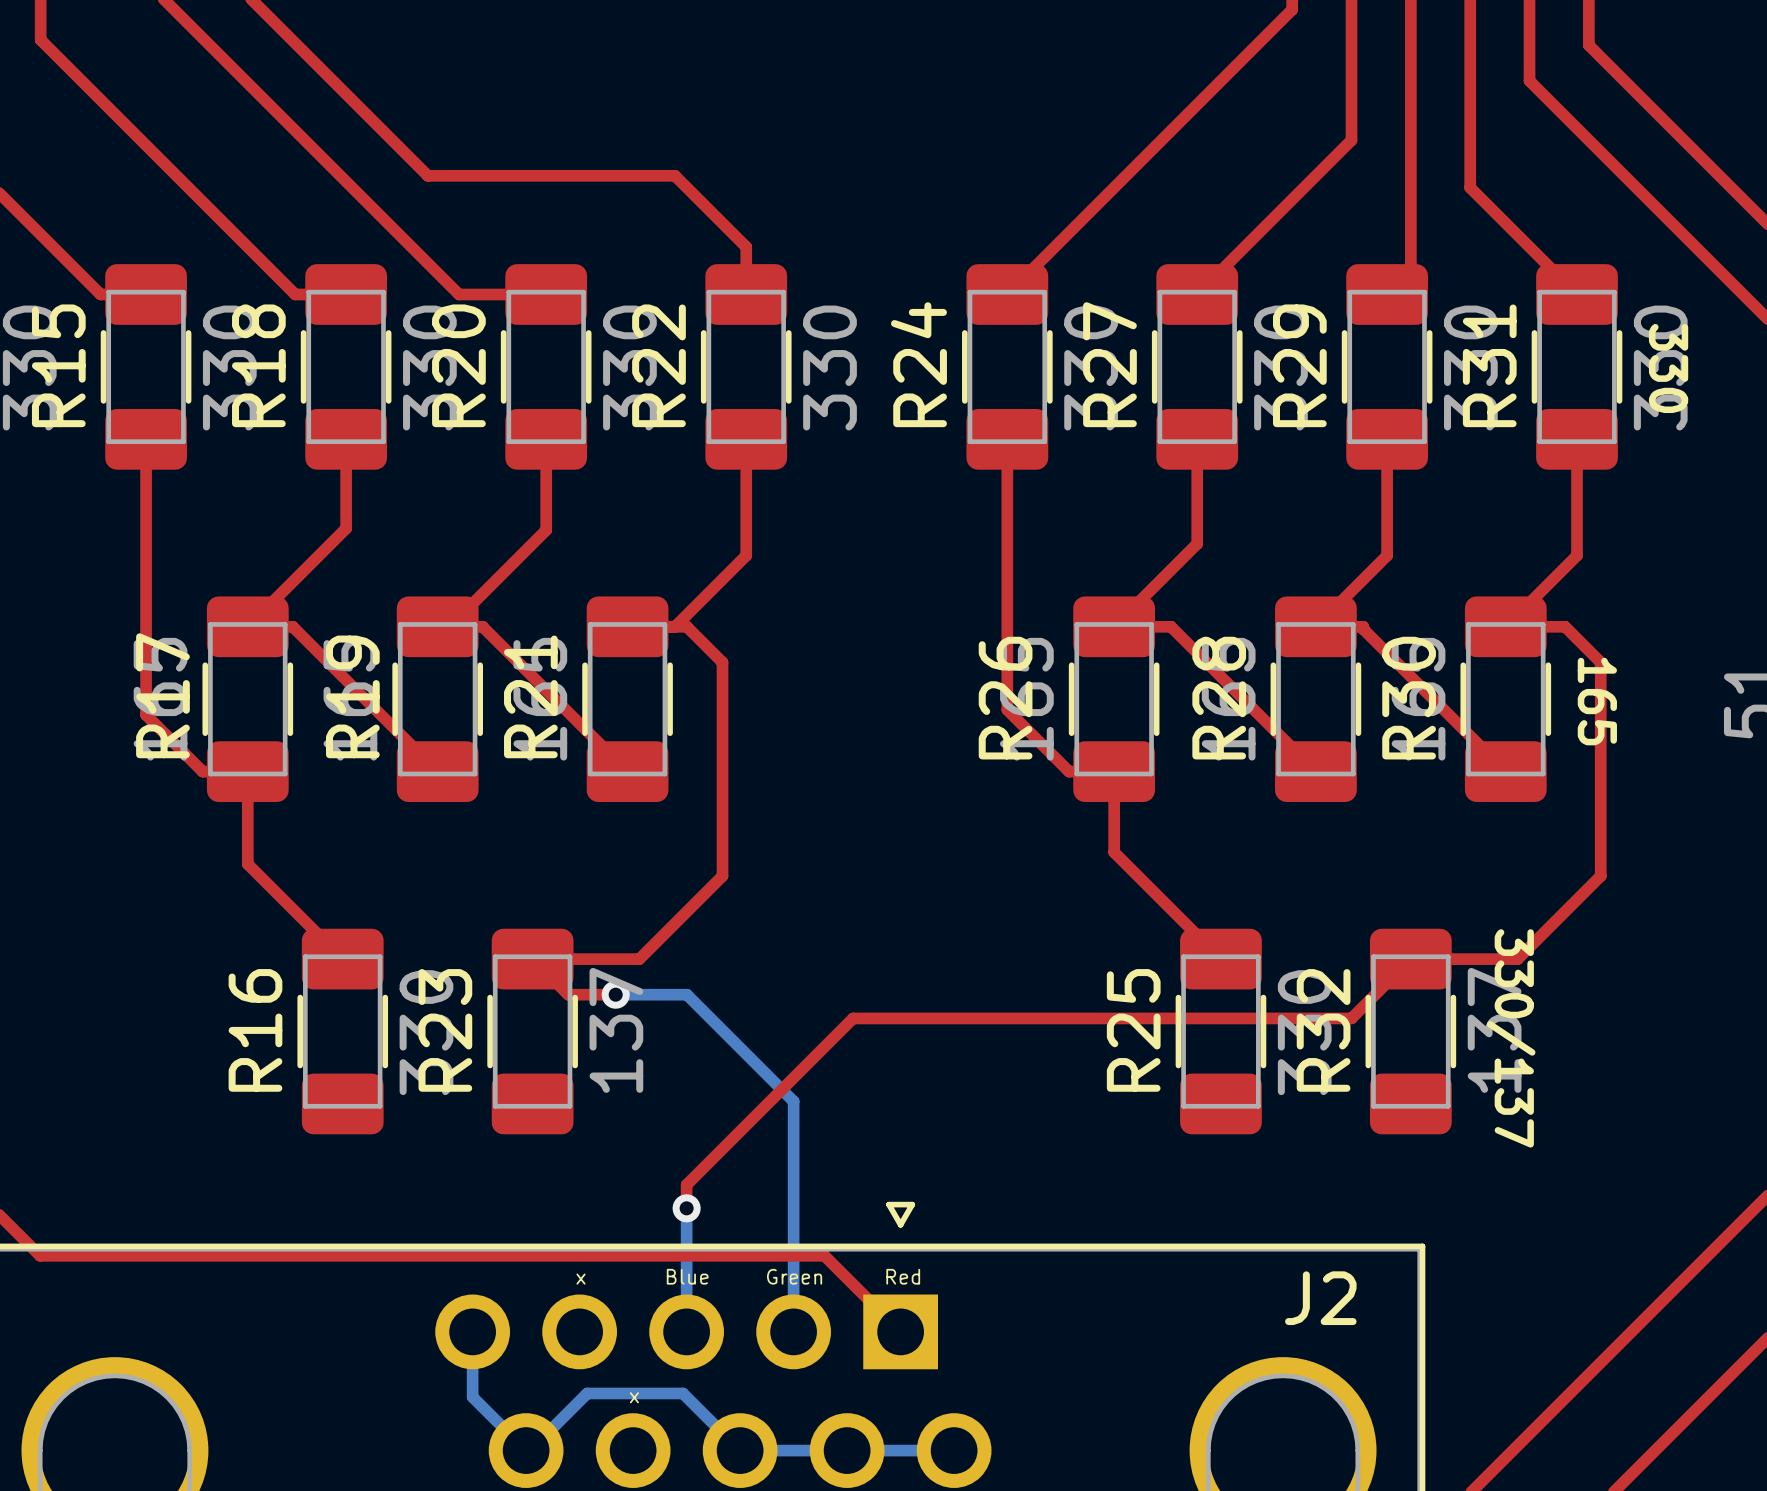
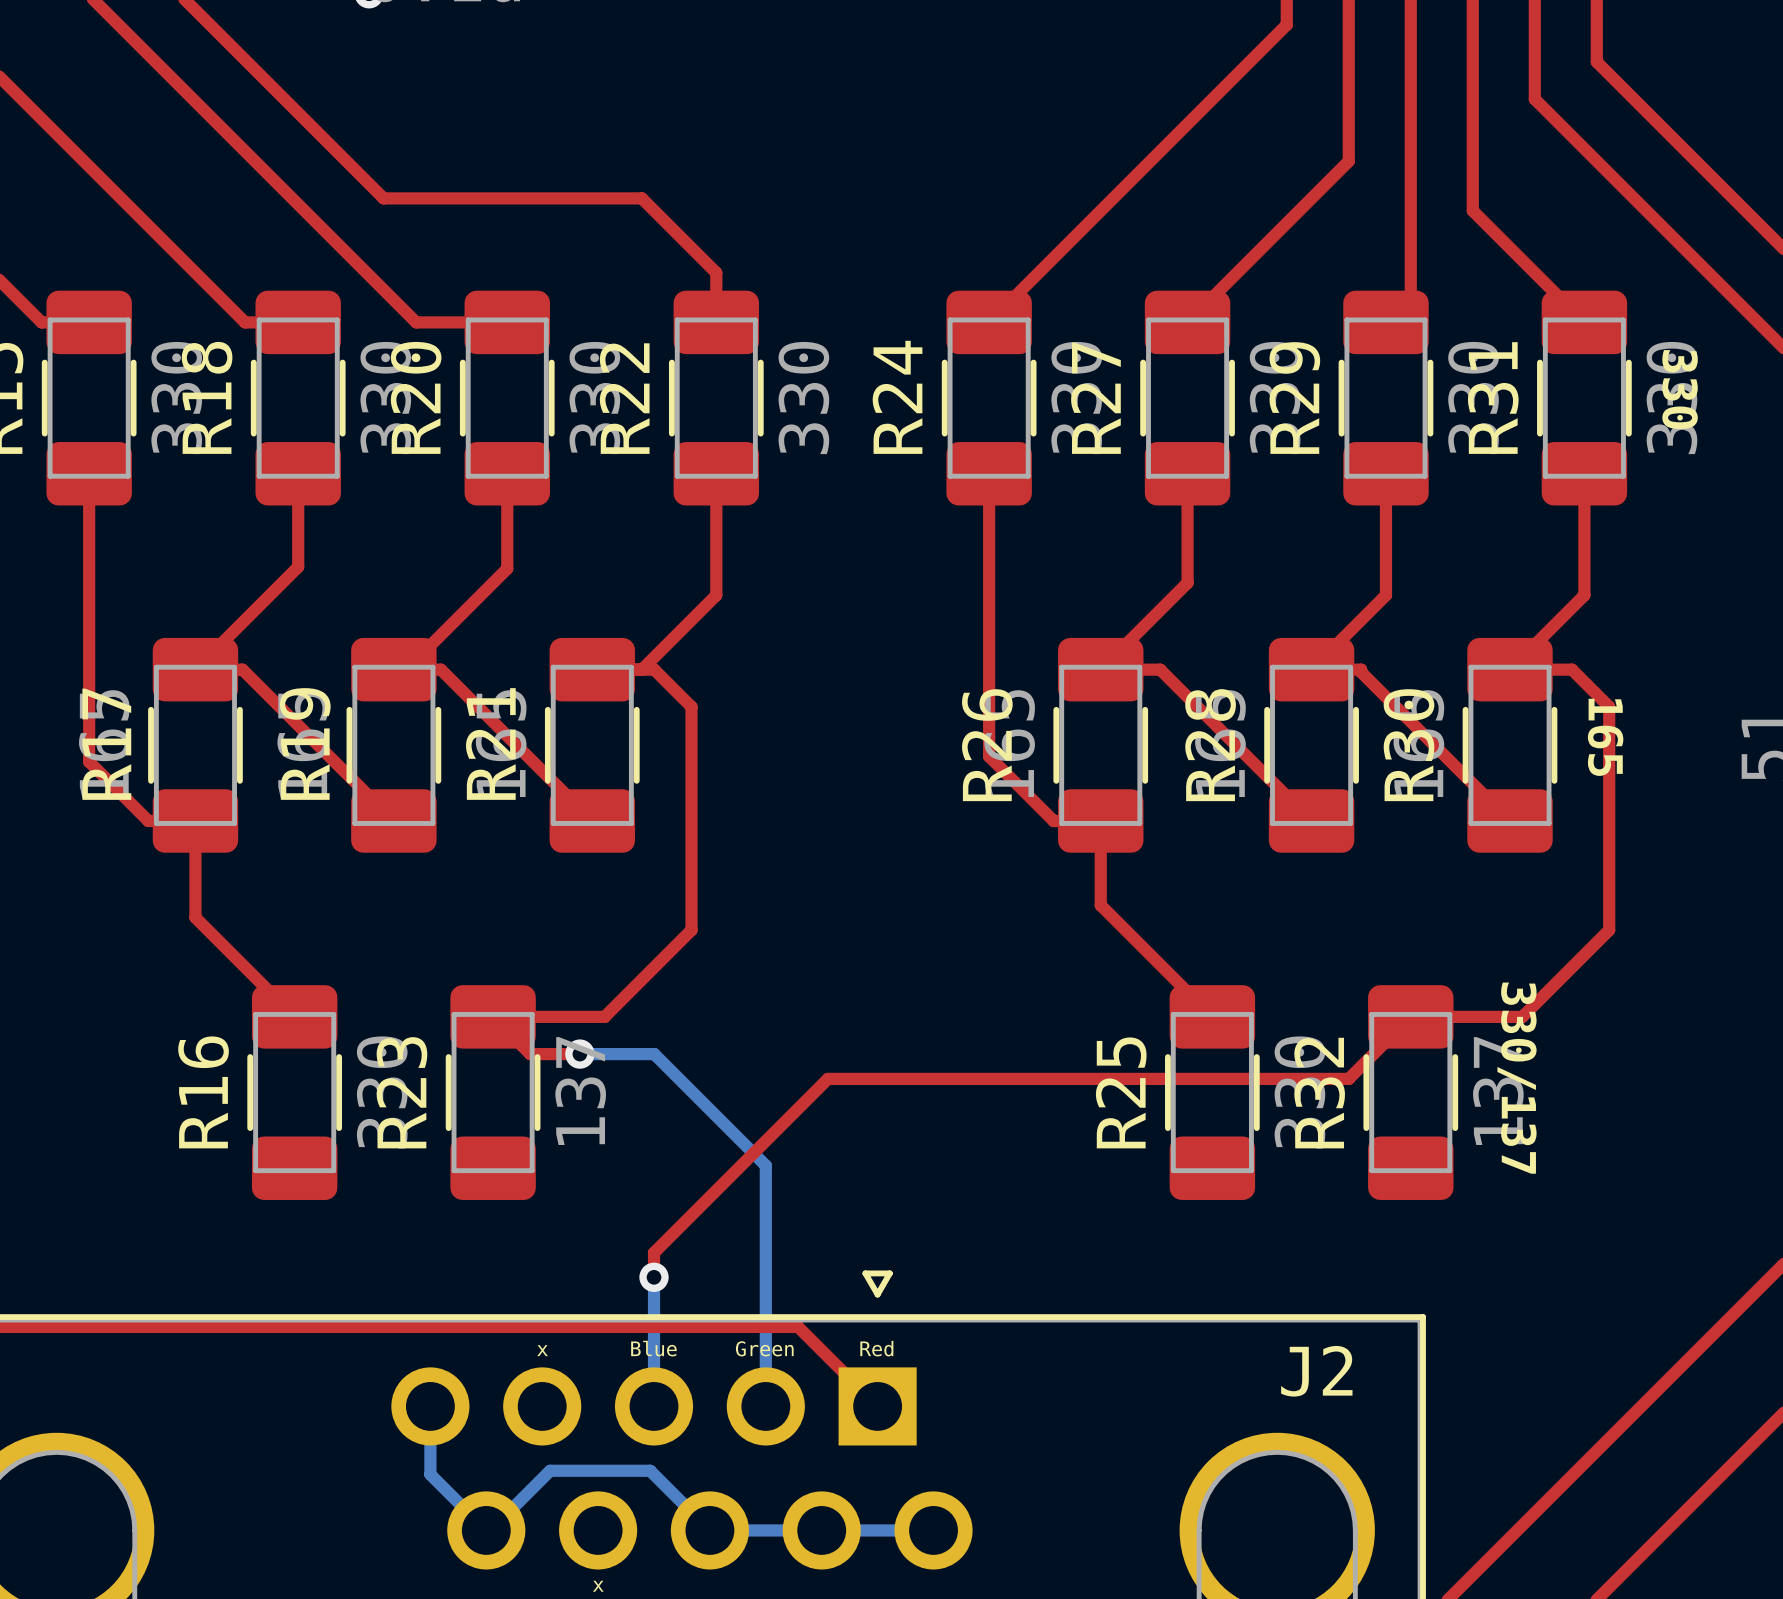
text: x (634, 1397) -> none

